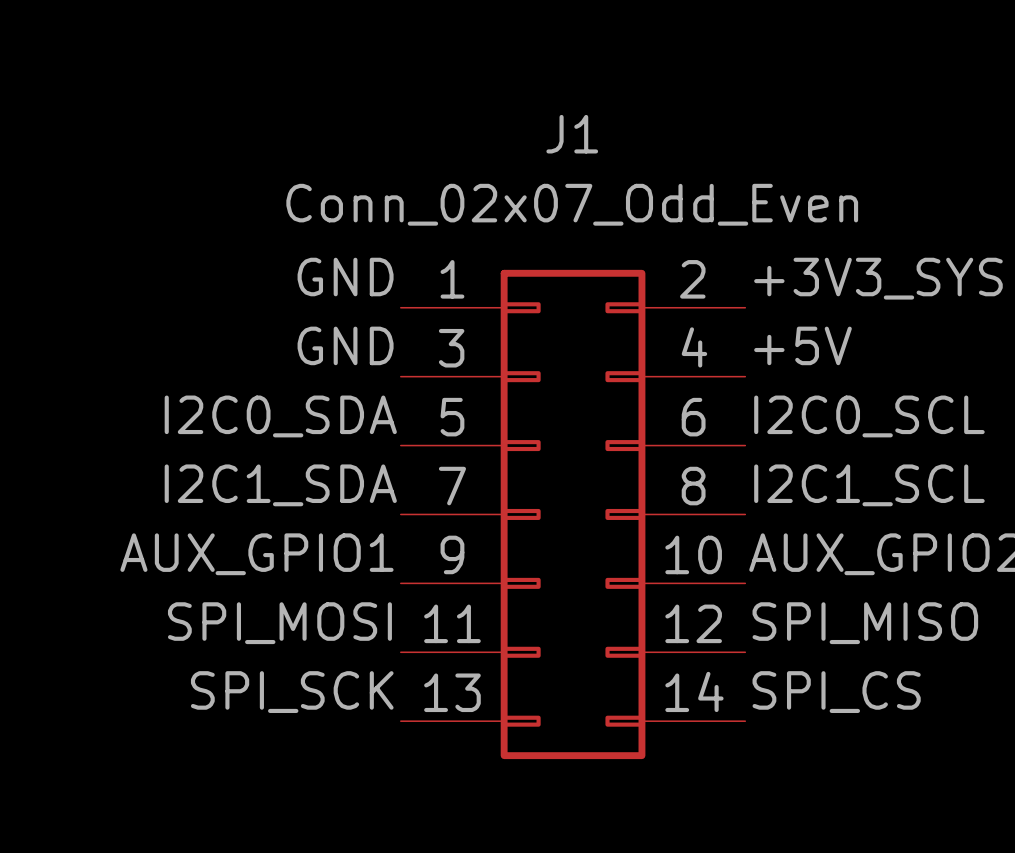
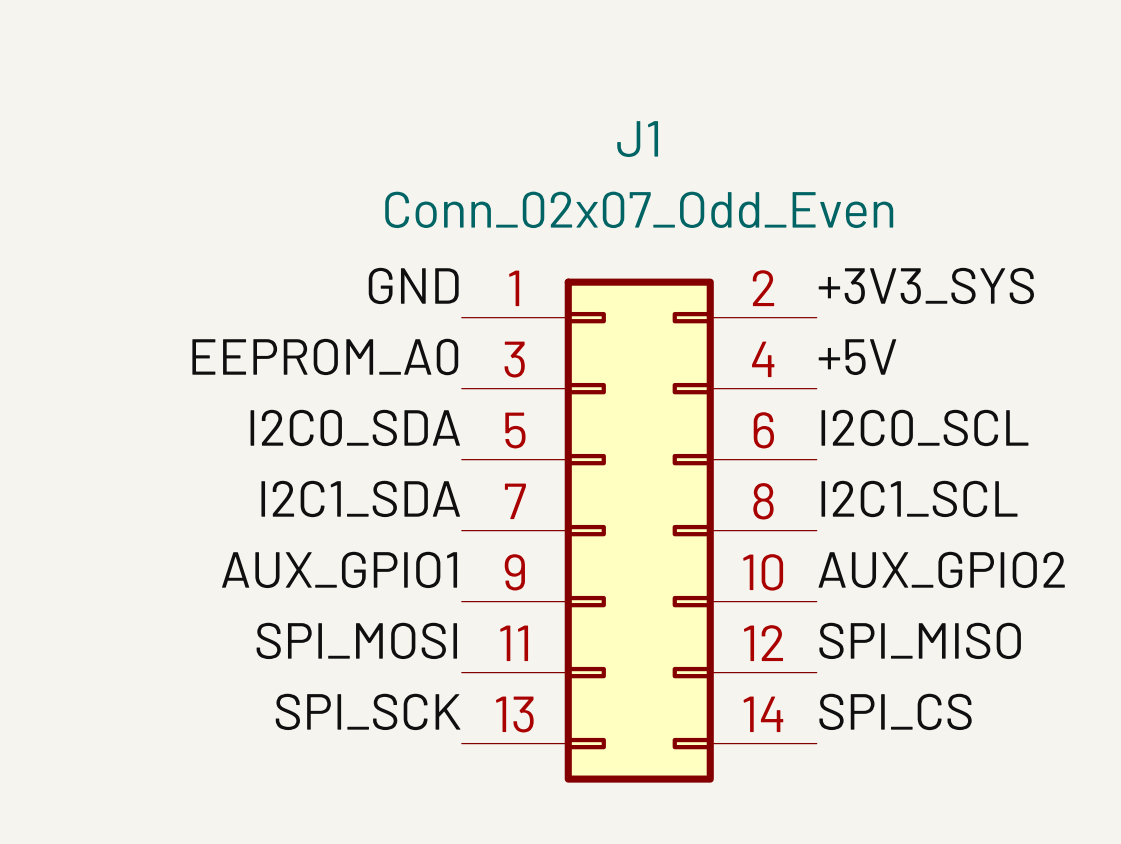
label: GND (345, 345) -> EEPROM_A0 (325, 356)

